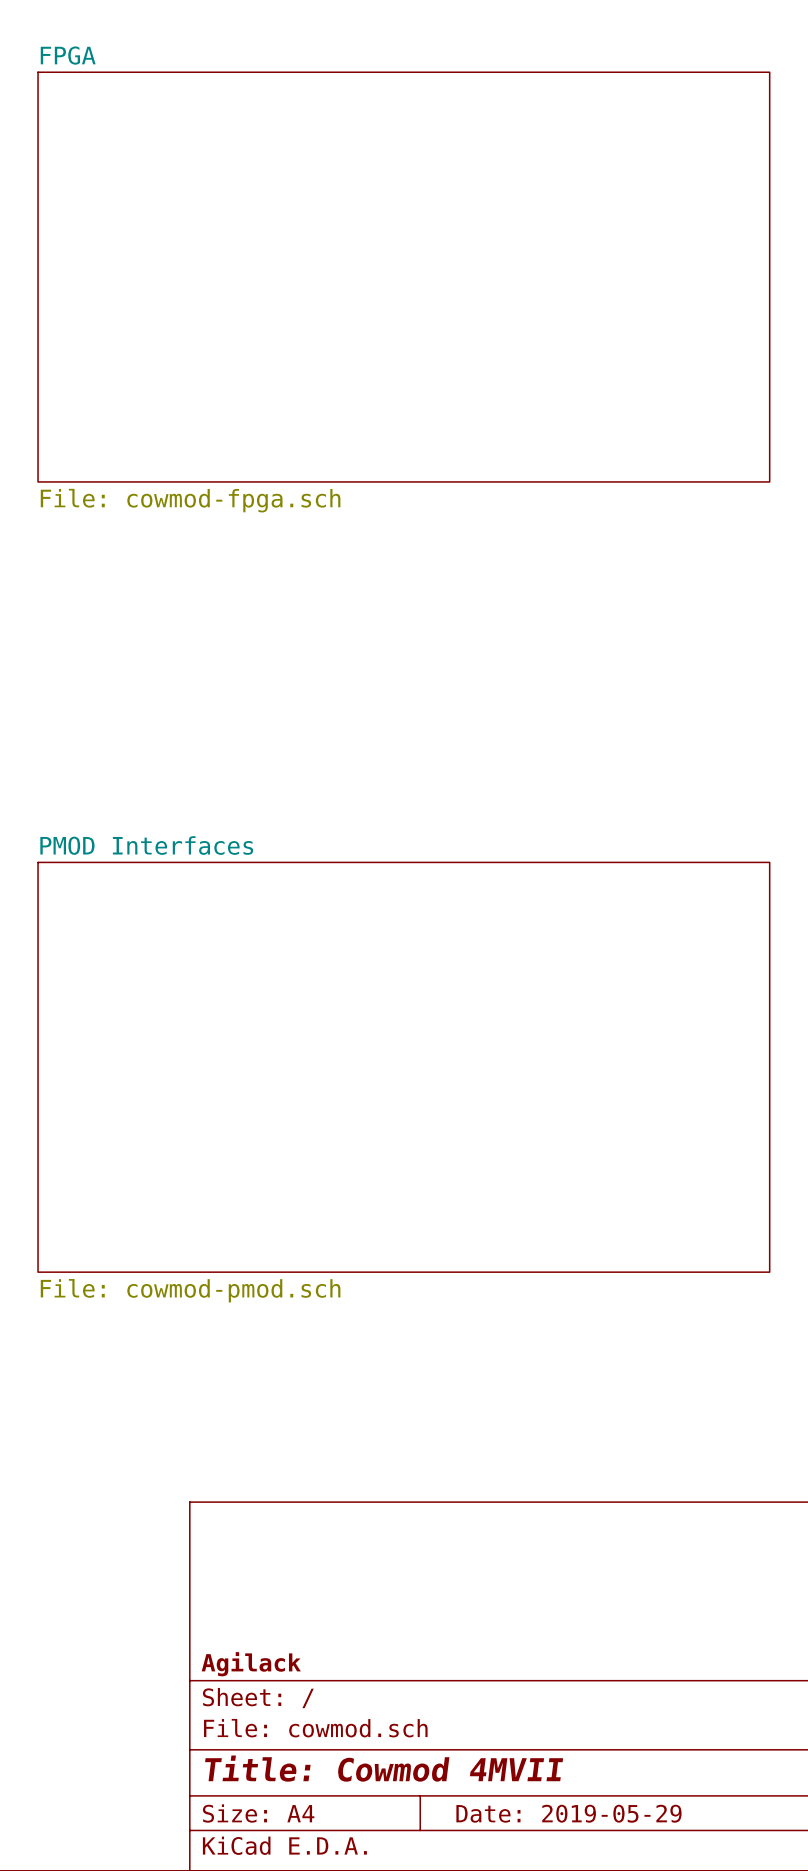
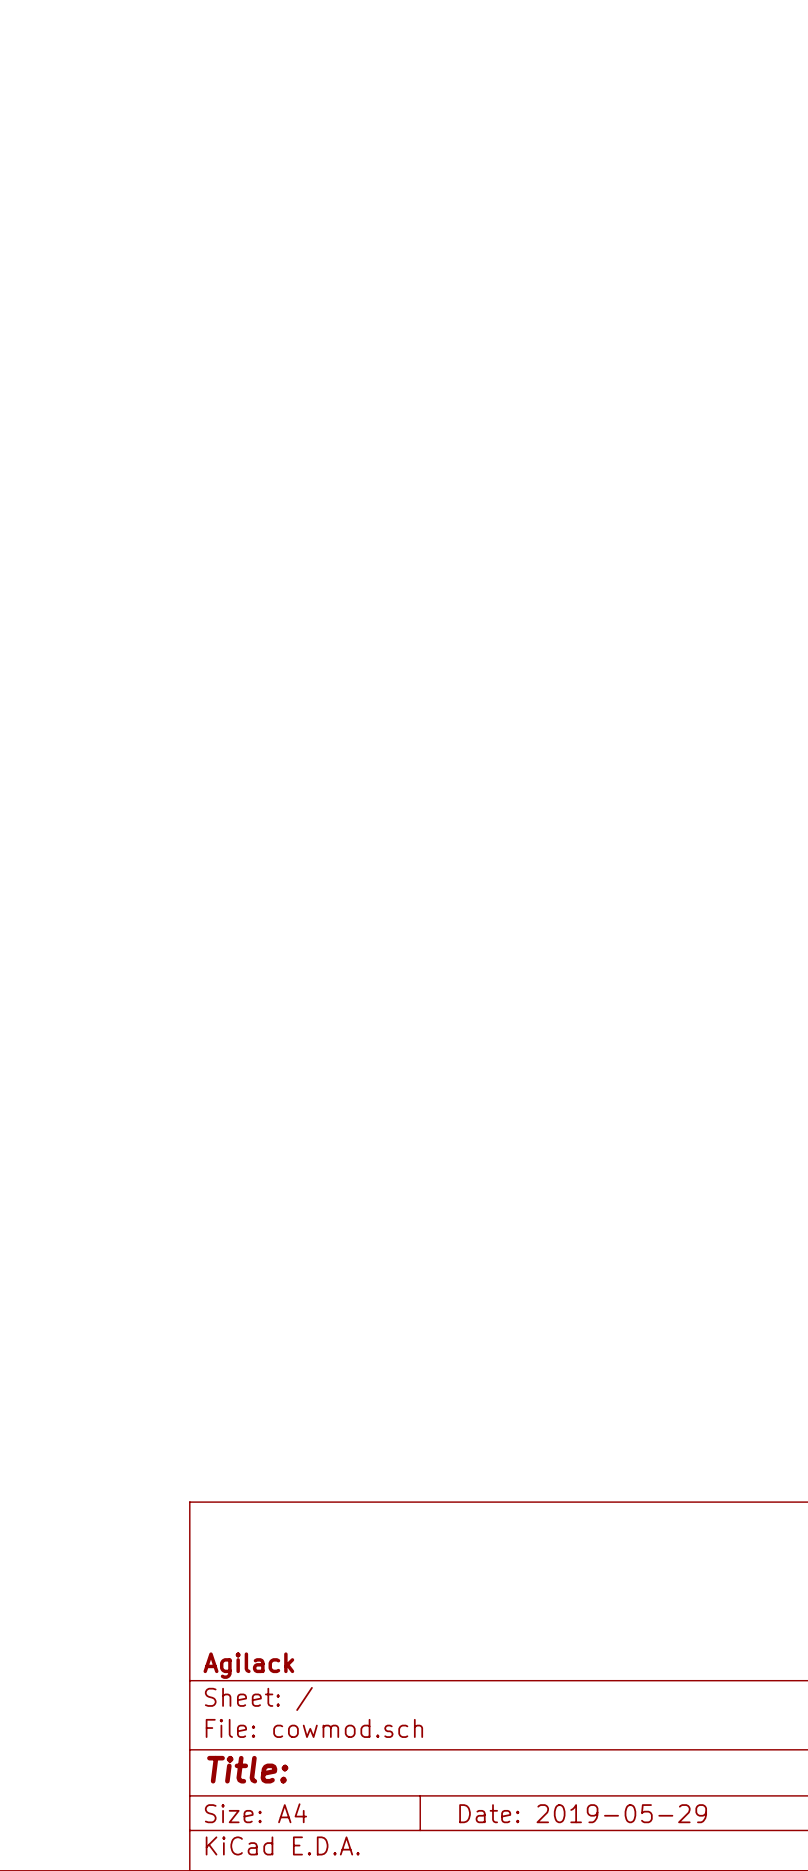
sheet FPGA: File: cowmod-fpga.sch (403, 277) -> none
sheet PMOD Interfaces: File: cowmod-pmod.sch (403, 1067) -> none
title block: Title: Cowmod 4MVII (384, 1768) -> Title: (247, 1769)

